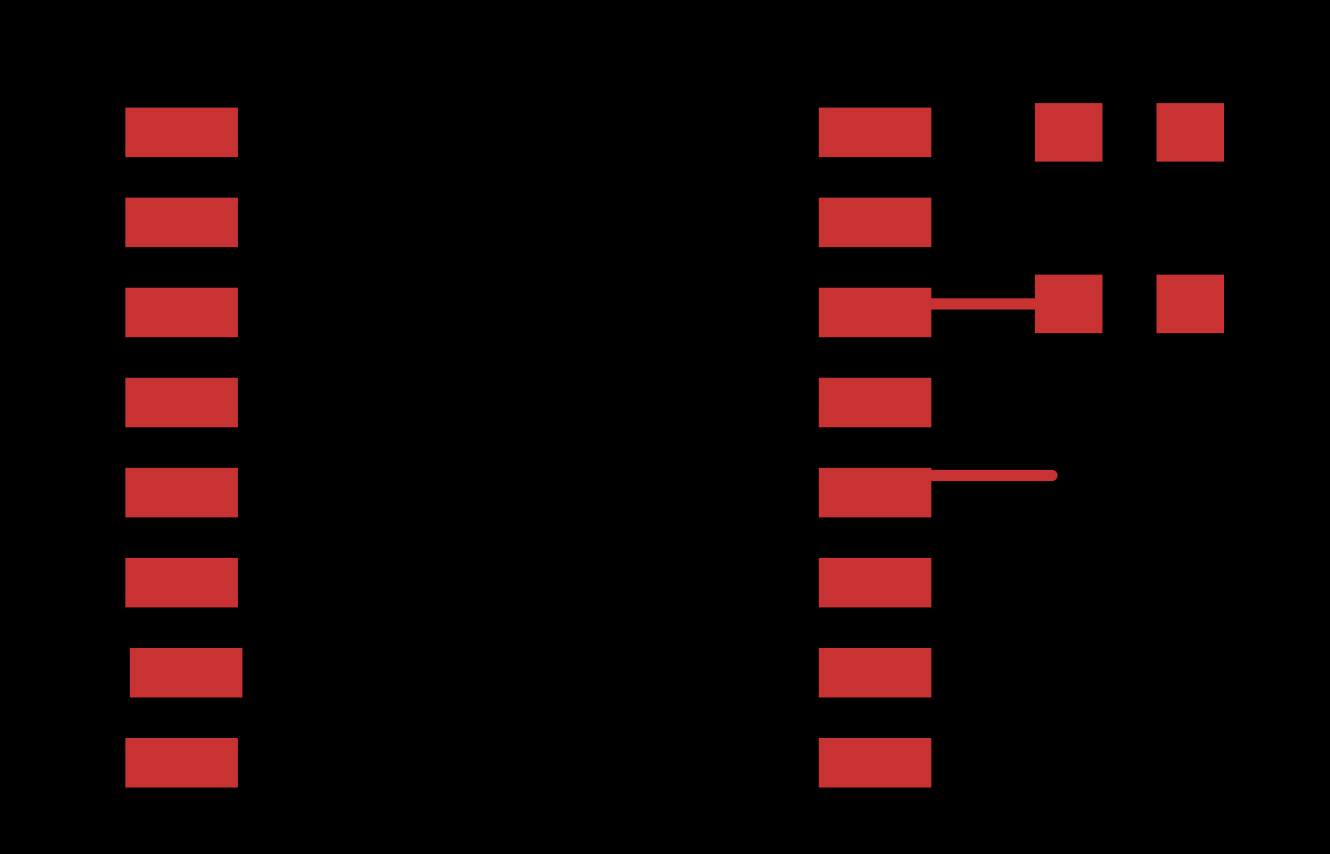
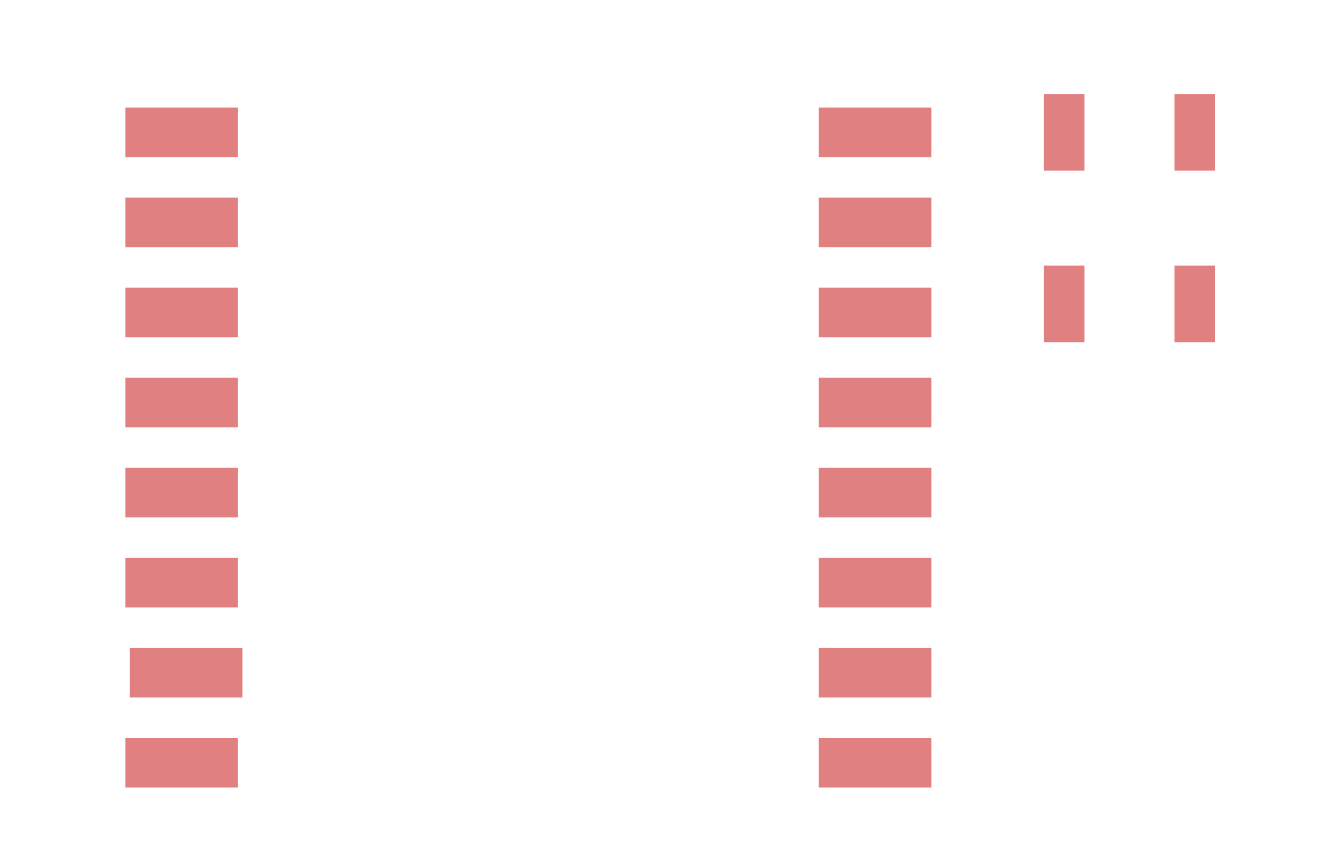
part footprint: [1034, 103, 1225, 162] -> [1043, 94, 1216, 171]
part footprint: [1034, 274, 1225, 334] -> [1043, 265, 1216, 343]
top track: (1052, 303) (843, 303) -> none
top track: (1052, 475) (852, 475) -> none

